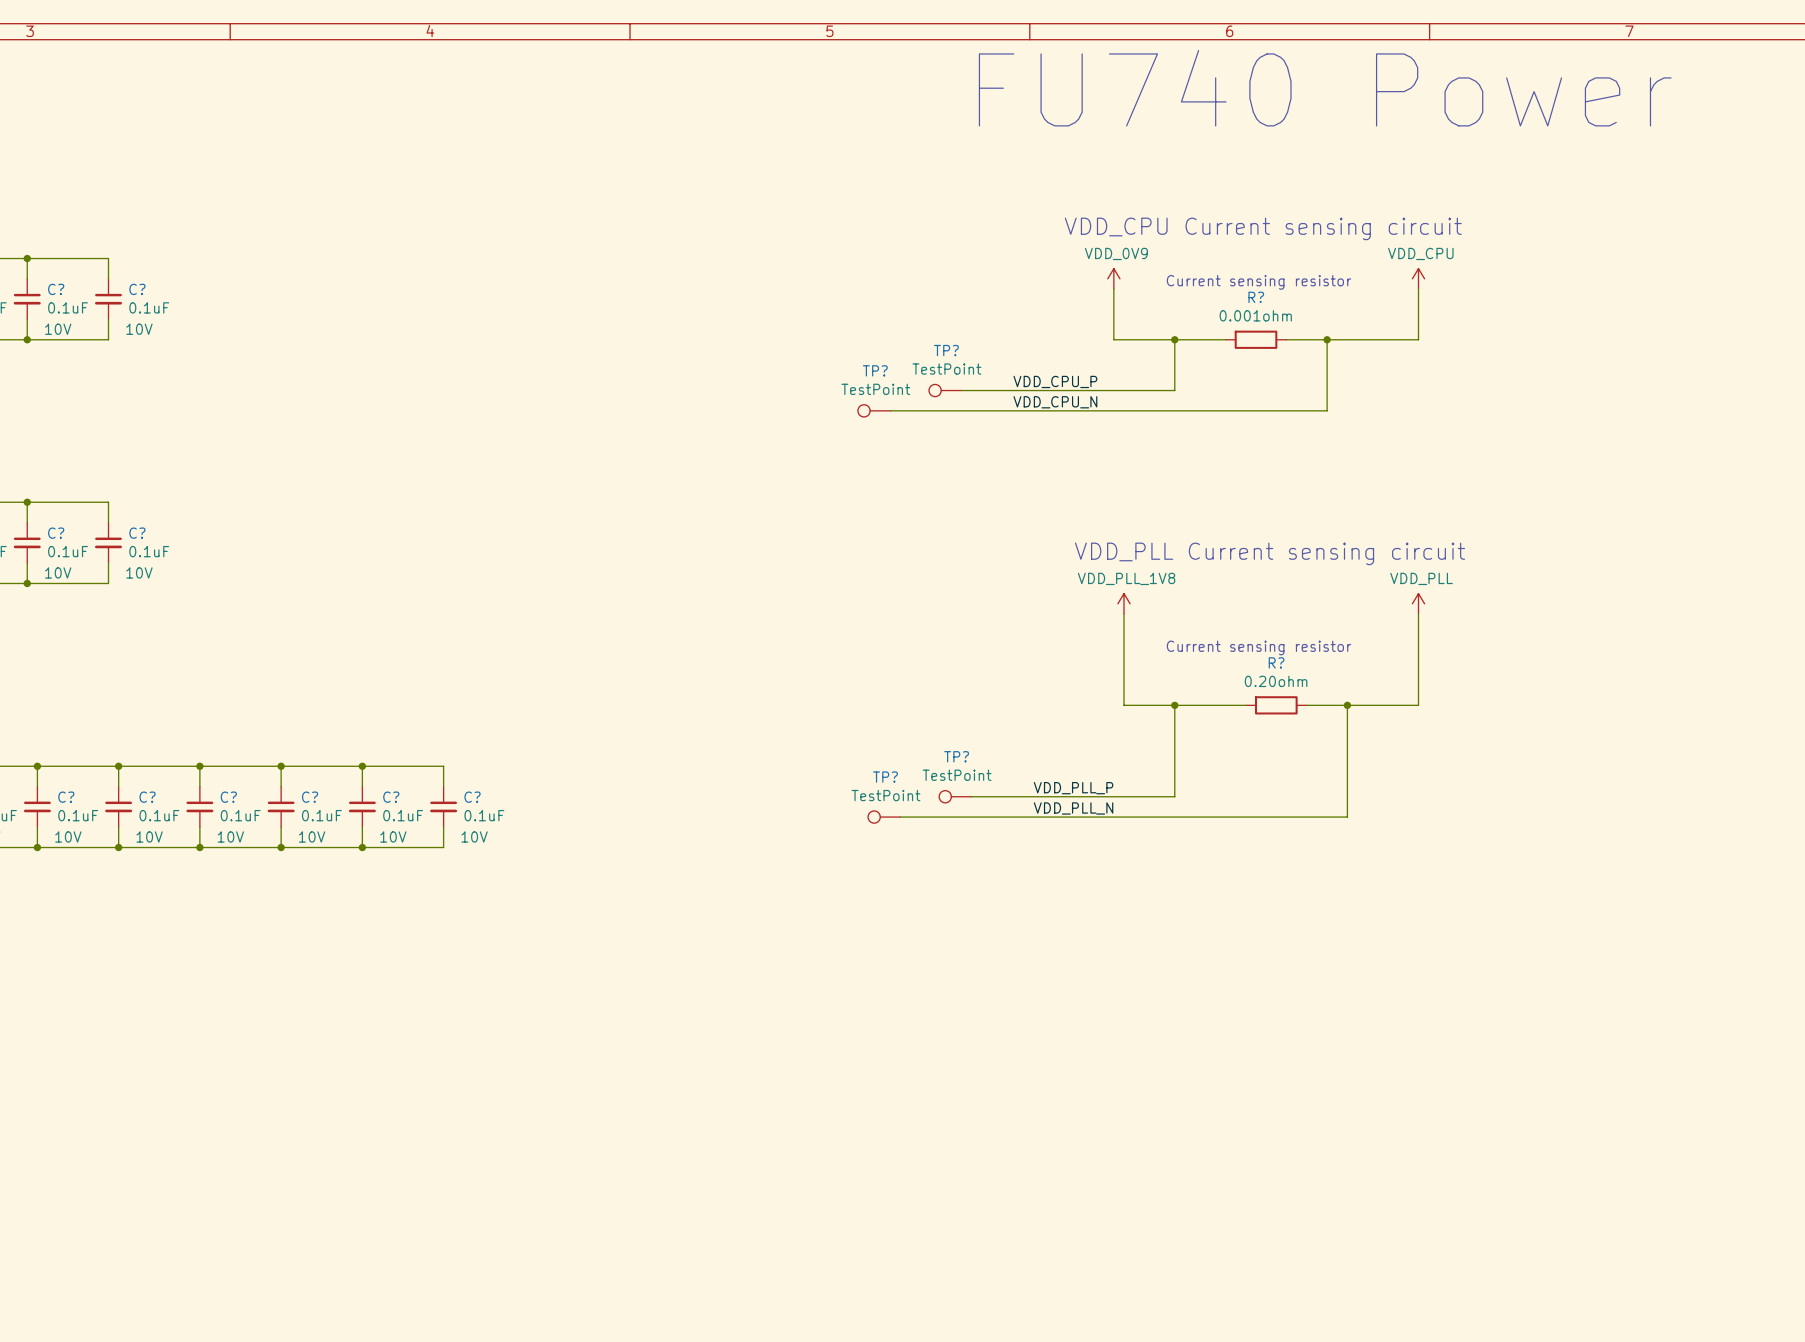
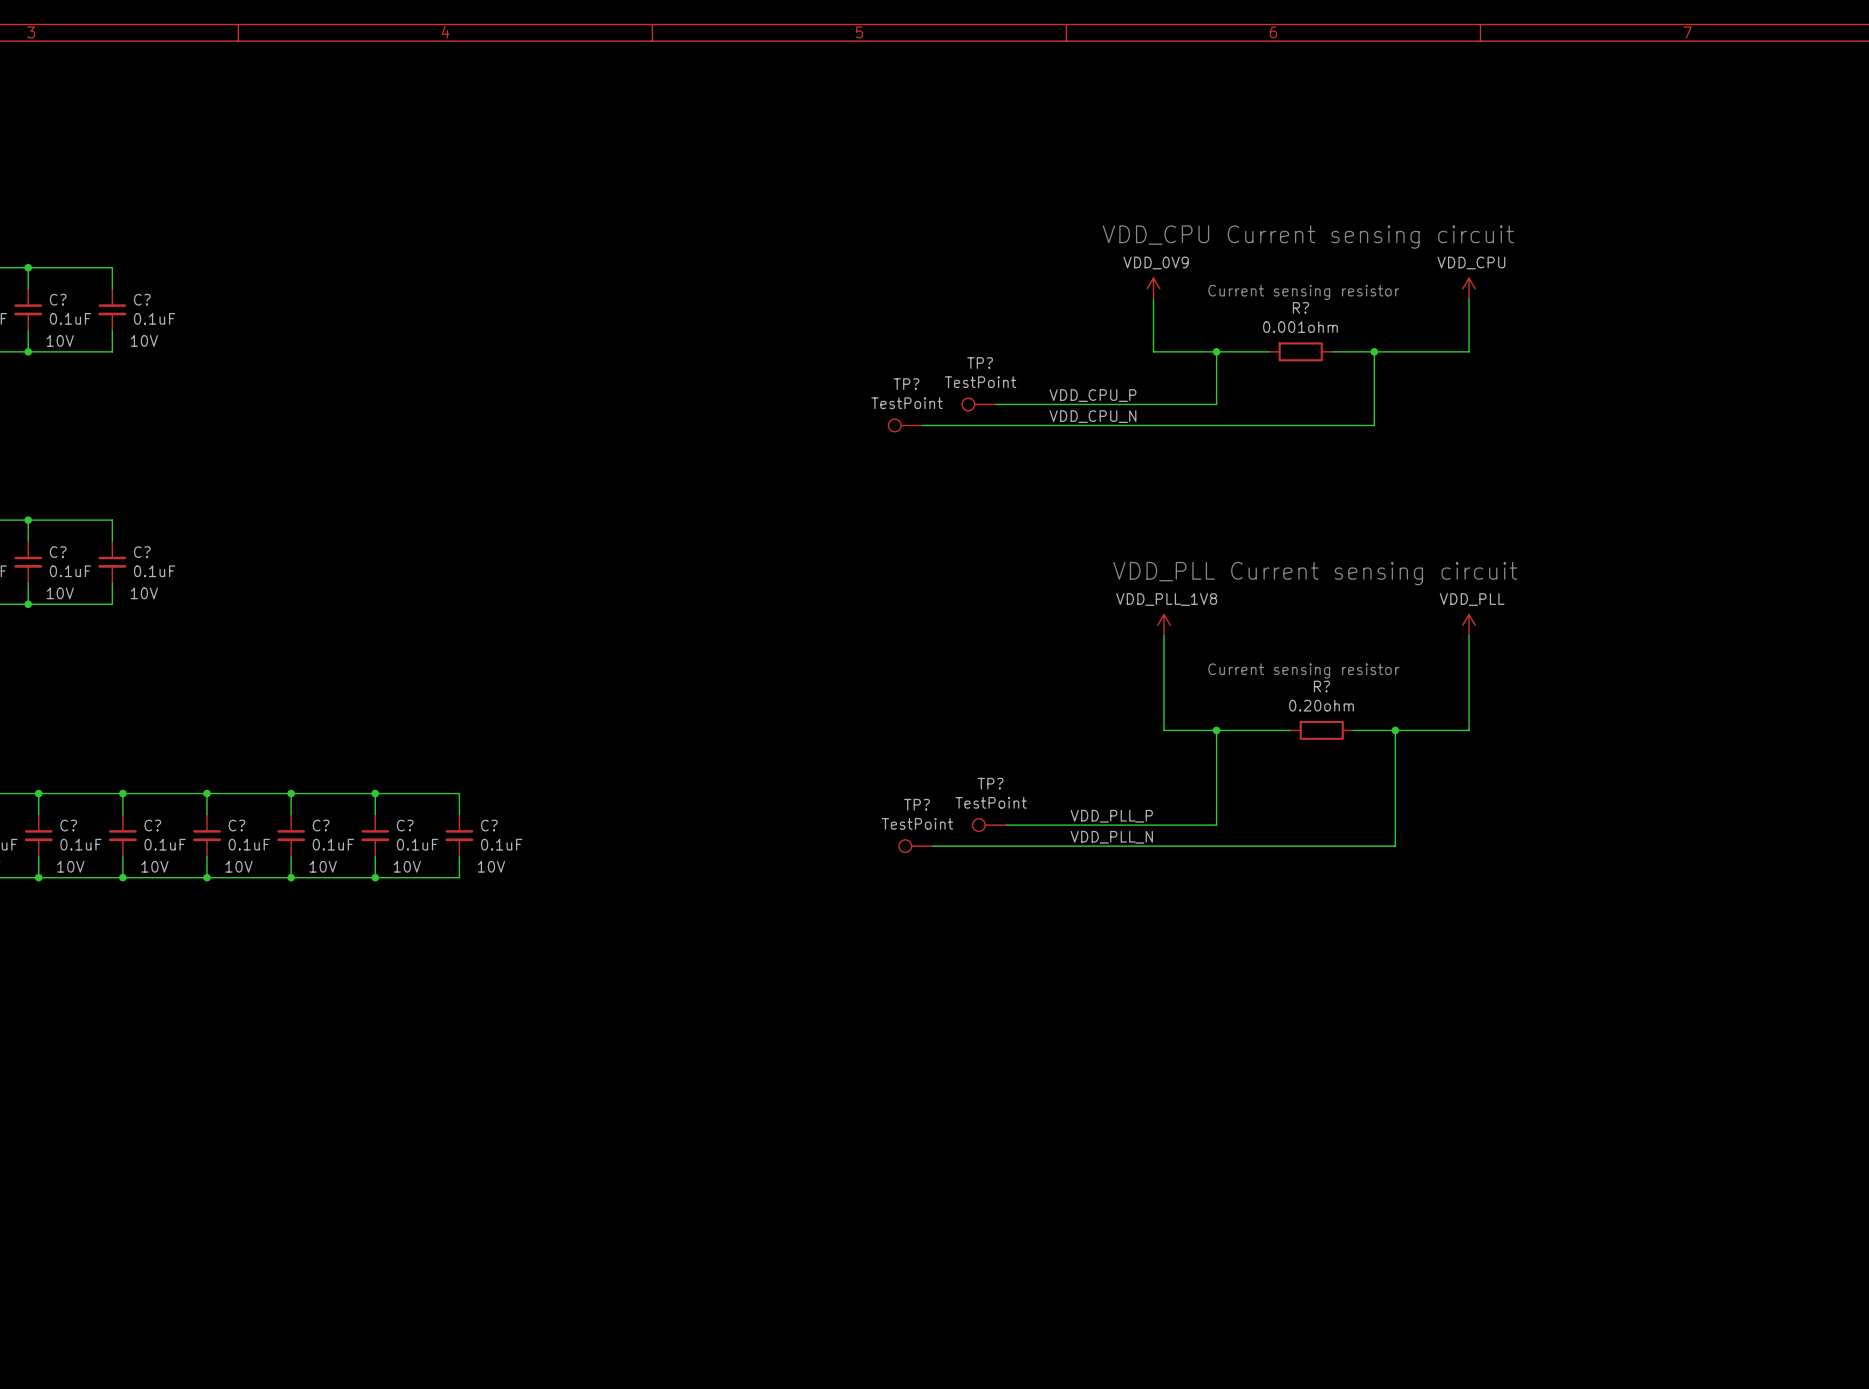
text: FU740 Power (1325, 88) -> none

